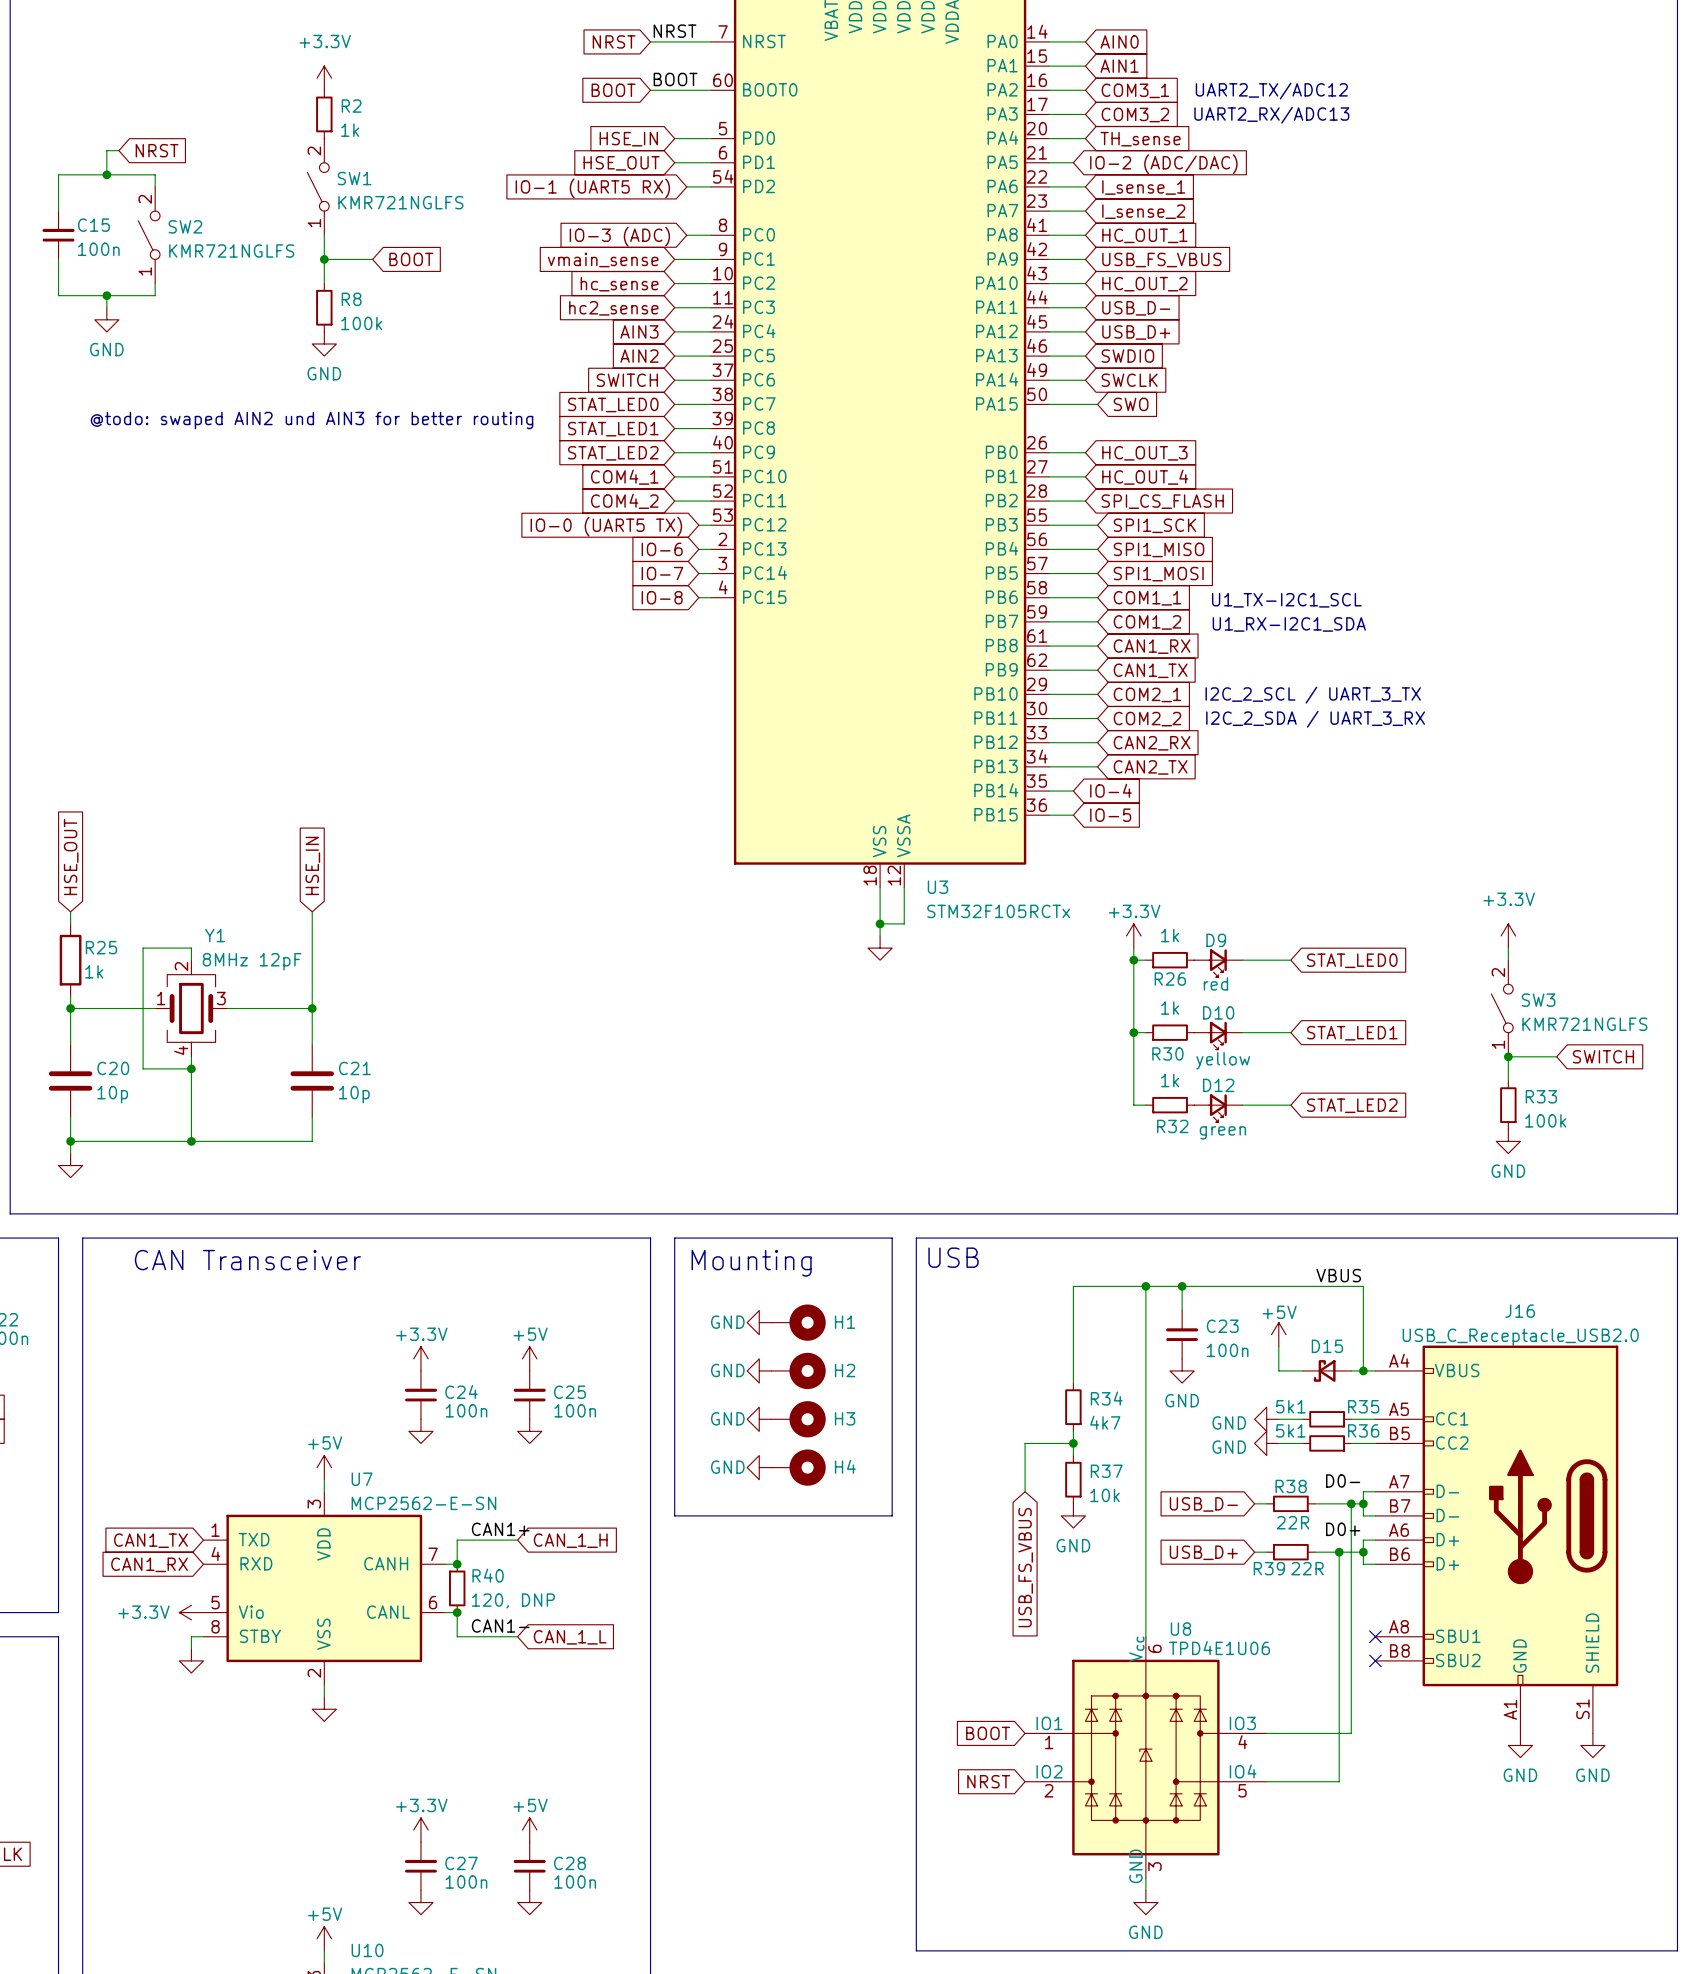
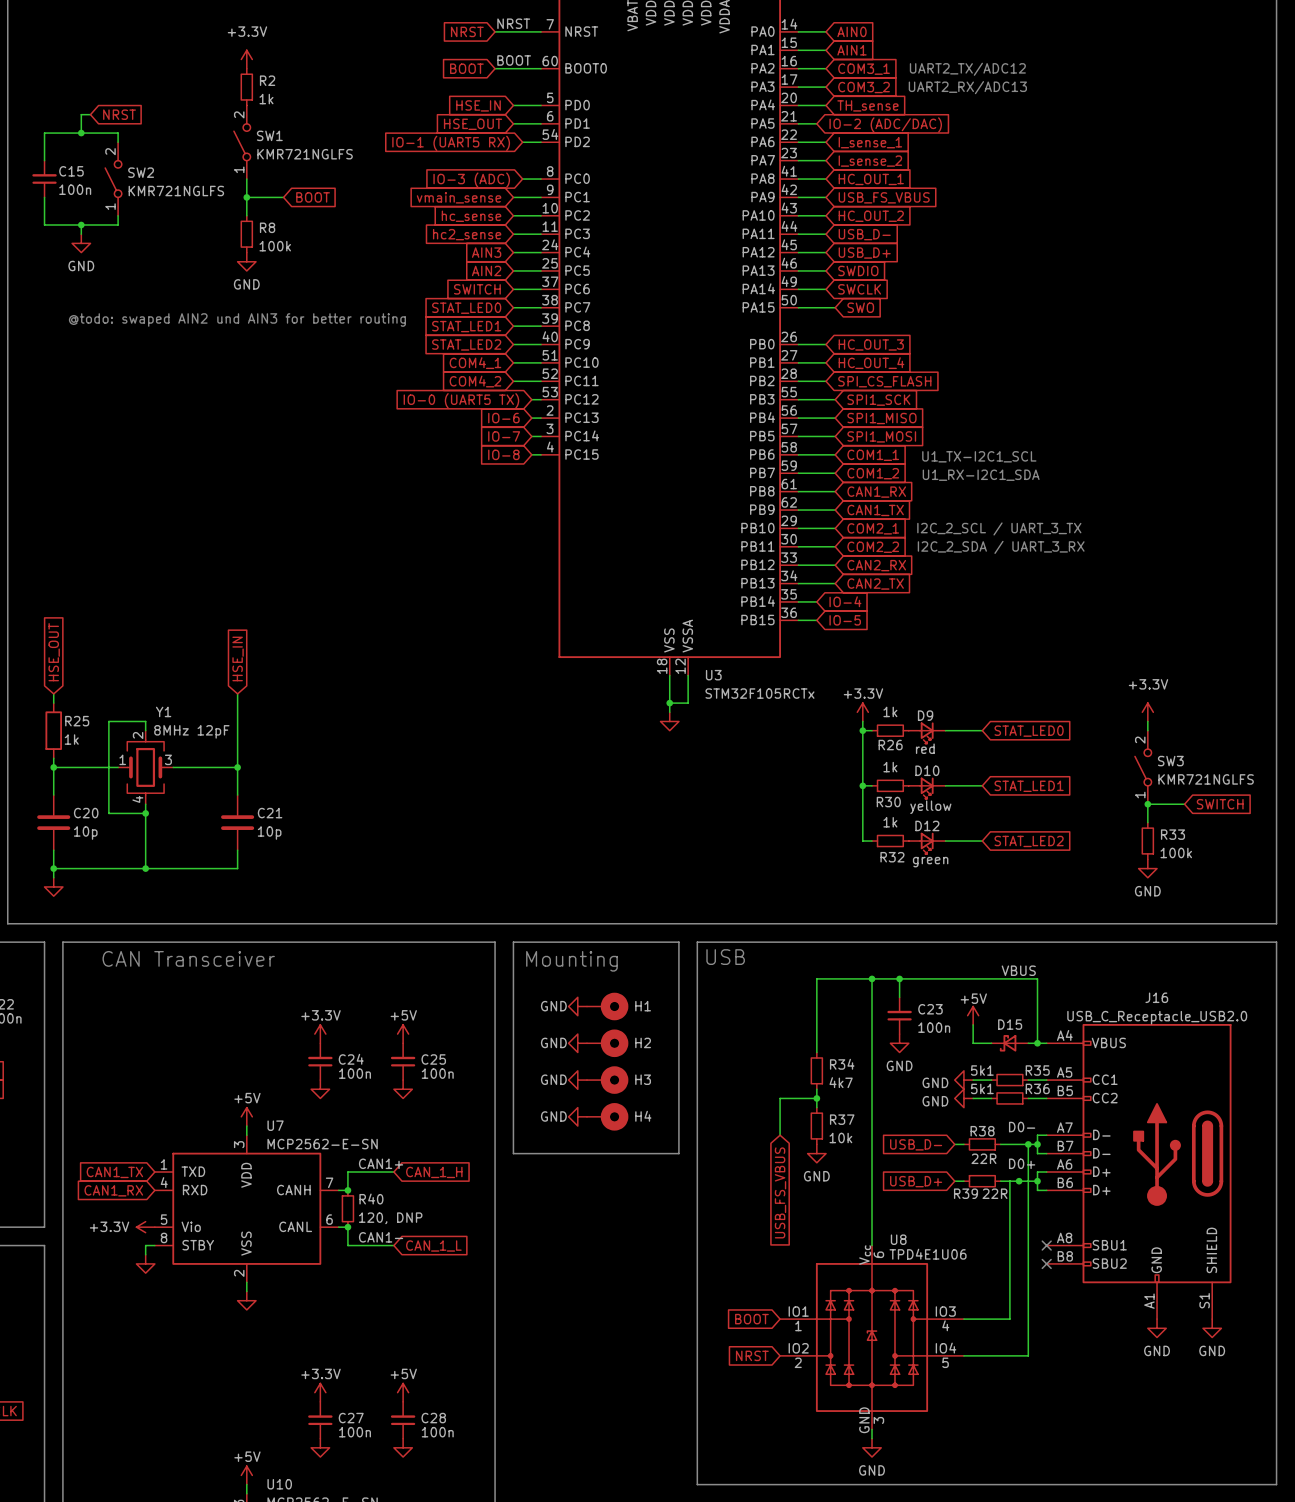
wire: none -> (1009, 1181) (1009, 1319)
wire: (1339, 1552) (1339, 1781) -> none
wire: (1327, 1733) (1351, 1733) -> (1019, 1355) (1028, 1355) (1028, 1319)

